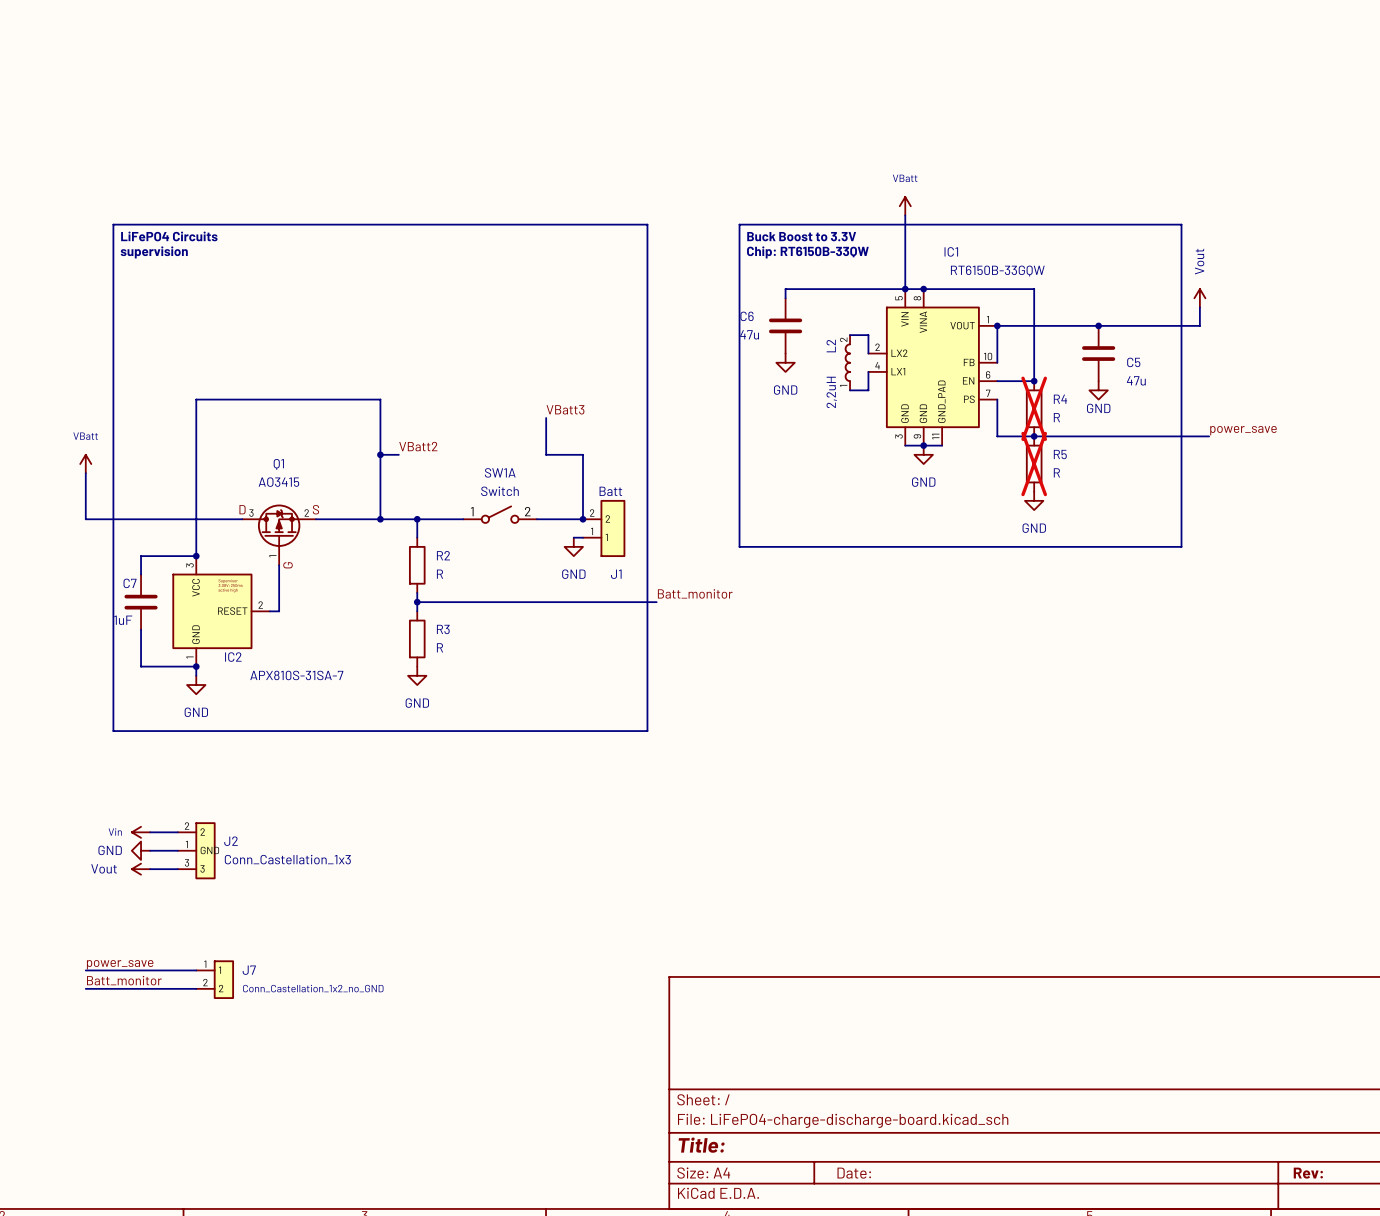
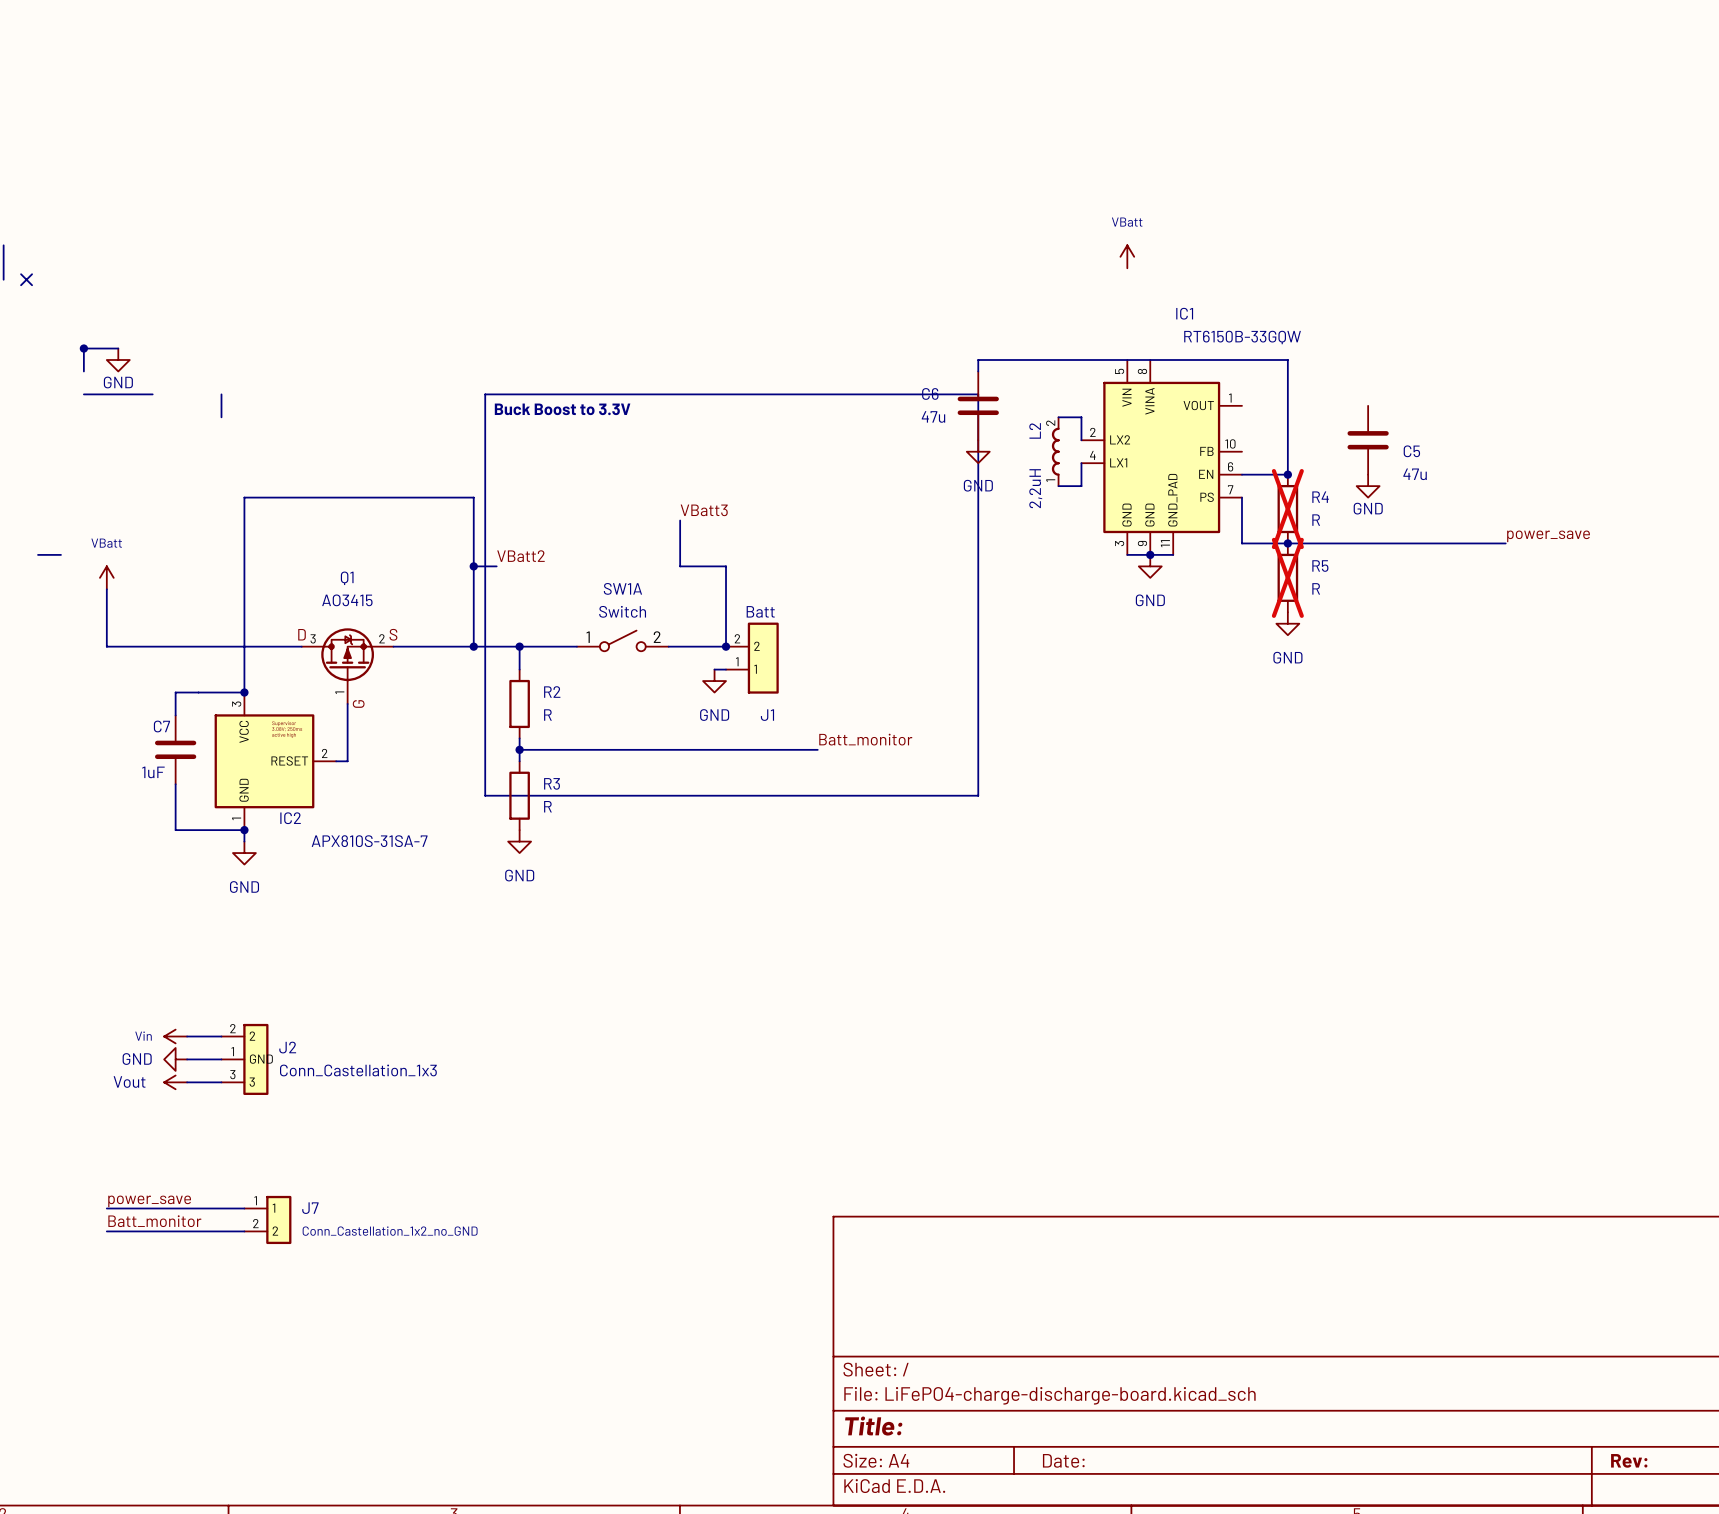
wire: none -> (3, 245) (3, 279)
wire: (905, 215) (905, 289) -> none
no-connect mark: none -> (26, 279)
line: (113, 224) (647, 224) (647, 731) (113, 731) (113, 224) -> none
line: (739, 224) (1181, 224) (1181, 546) (739, 546) (739, 224) -> none
text: LiFePO4 Circuits (169, 236) -> none
text: Buck Boost to 3.3V (801, 236) -> none
text: supervision (154, 252) -> none
text: Chip: RT6150B-33QW (807, 252) -> none
junction: none -> (83, 348)
wire: none -> (118, 348) (83, 348) (83, 371)
power symbol: none -> GND (118, 359)
junction: (905, 289) -> none
junction: (923, 289) -> none
power symbol: Vout (1199, 298) -> none
wire: (1199, 307) (1199, 325) (997, 325) (997, 362) -> none
wire: none -> (83, 394) (152, 394)
wire: none -> (221, 394) (221, 417)
line: none -> (485, 394) (978, 394) (978, 795) (485, 795) (485, 394)
junction: (997, 325) -> none
junction: (1098, 325) -> none
text: none -> Buck Boost to 3.3V (562, 409)
wire: none -> (38, 554) (60, 554)

